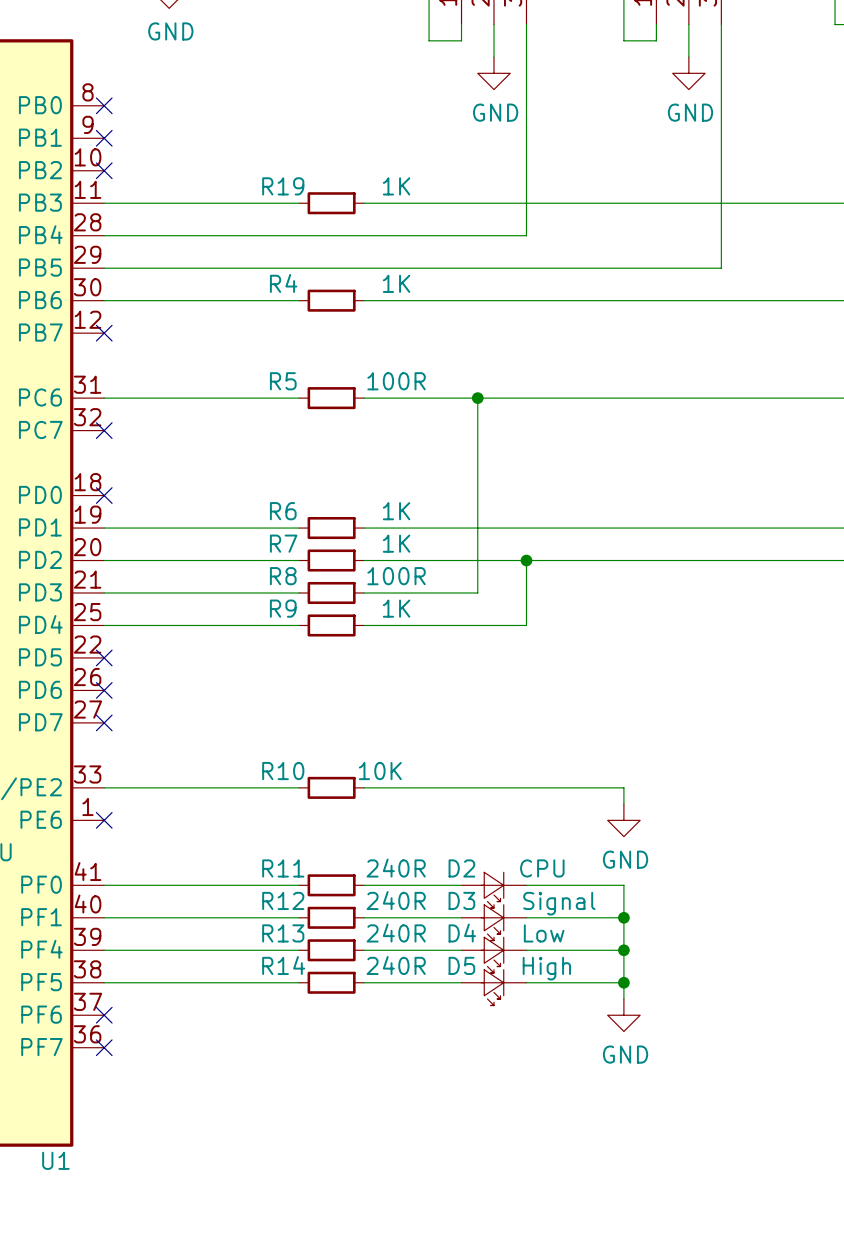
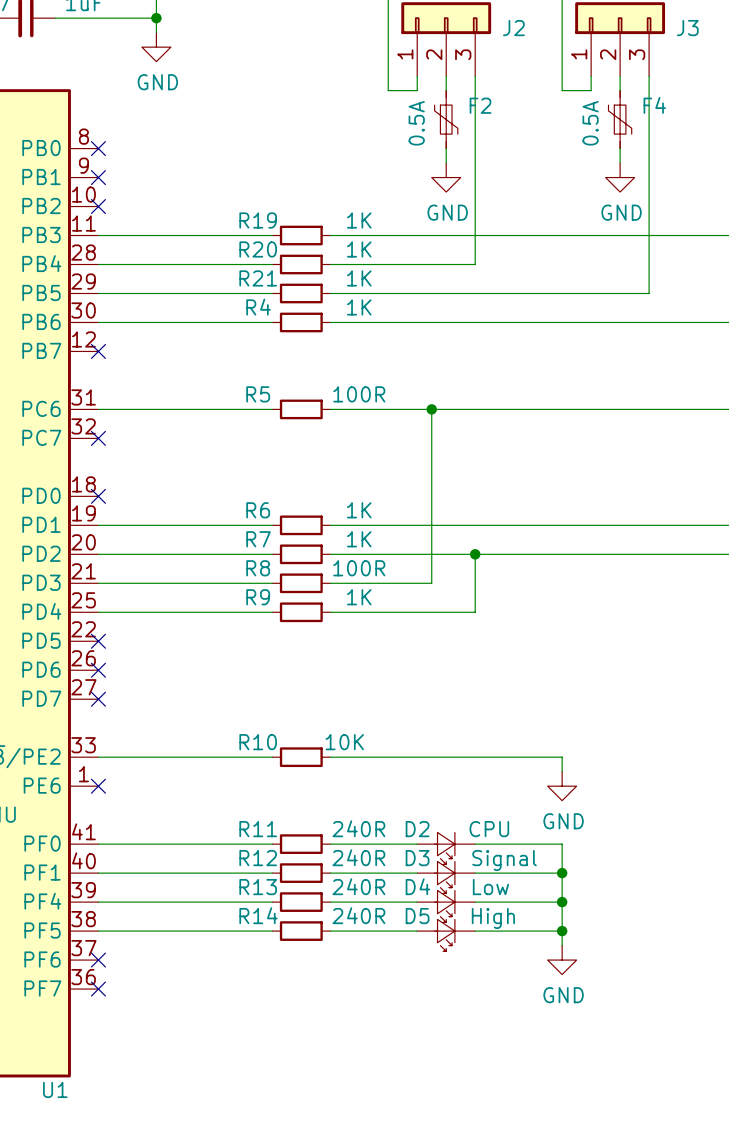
F2: none -> 0.5A (446, 119)
power symbol position: GND (494, 73) -> GND (446, 177)
F4: none -> 0.5A (620, 119)
power symbol position: GND (688, 73) -> GND (620, 177)
wire: (299, 235) (364, 235) -> none
R20: none -> 1K (301, 264)
wire: (299, 268) (364, 268) -> none
R21: none -> 1K (301, 293)

